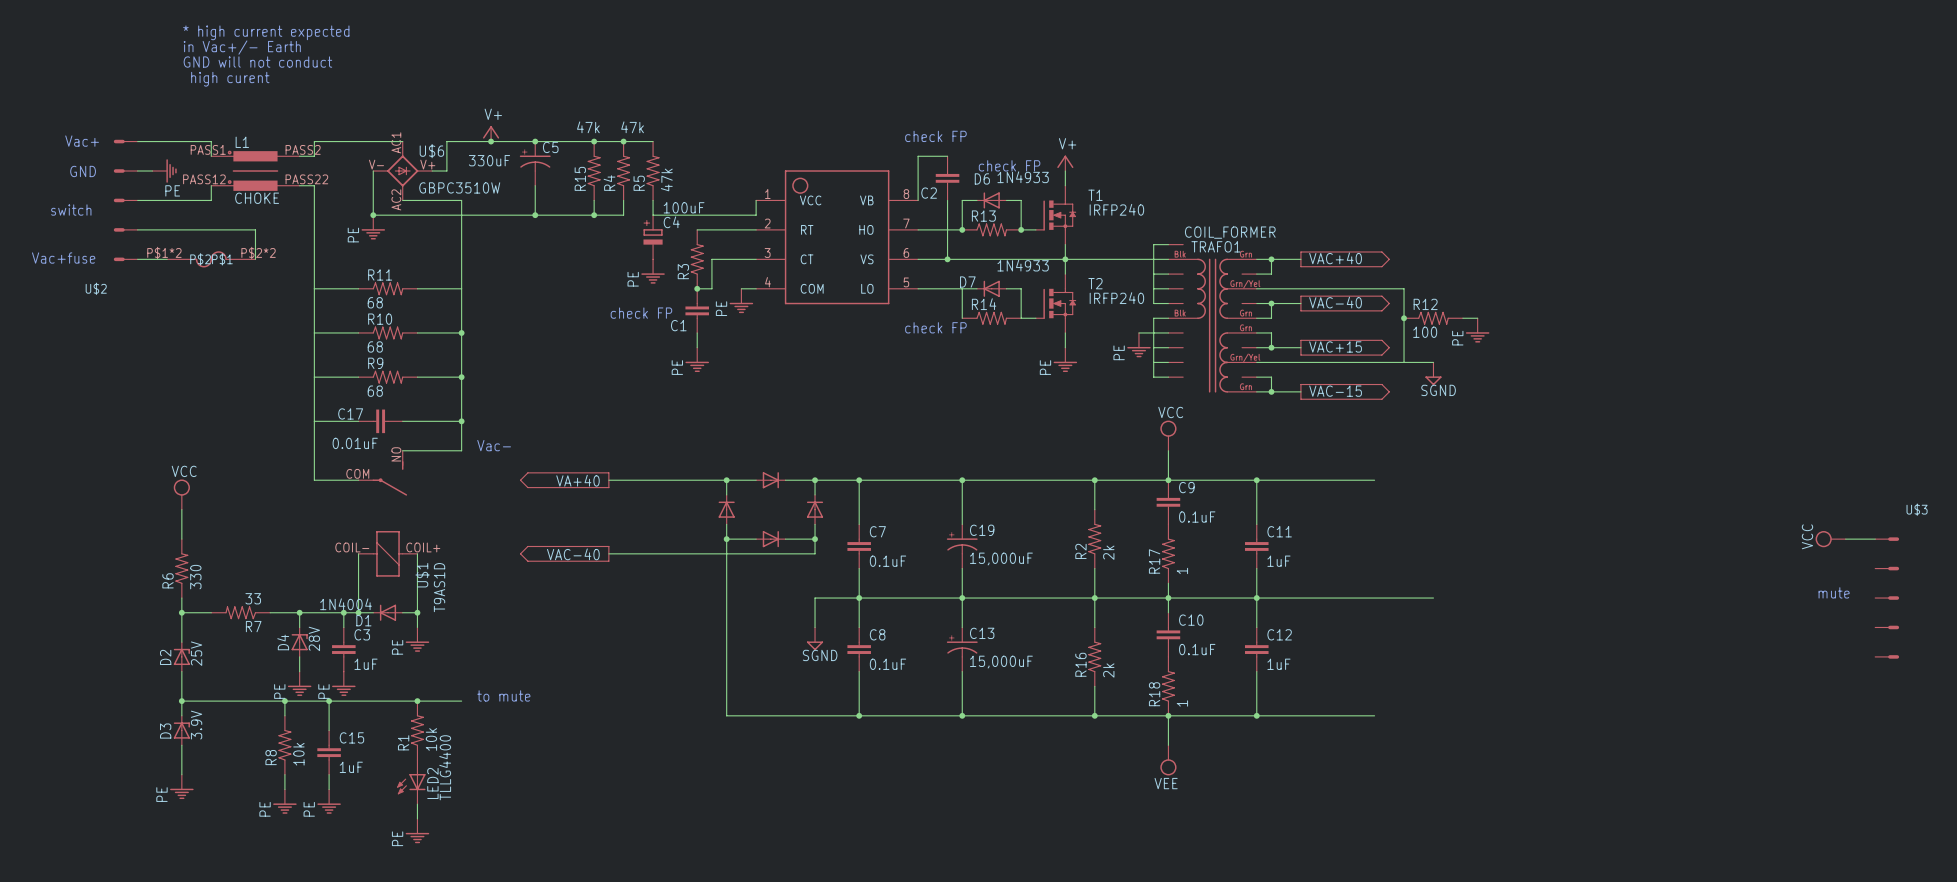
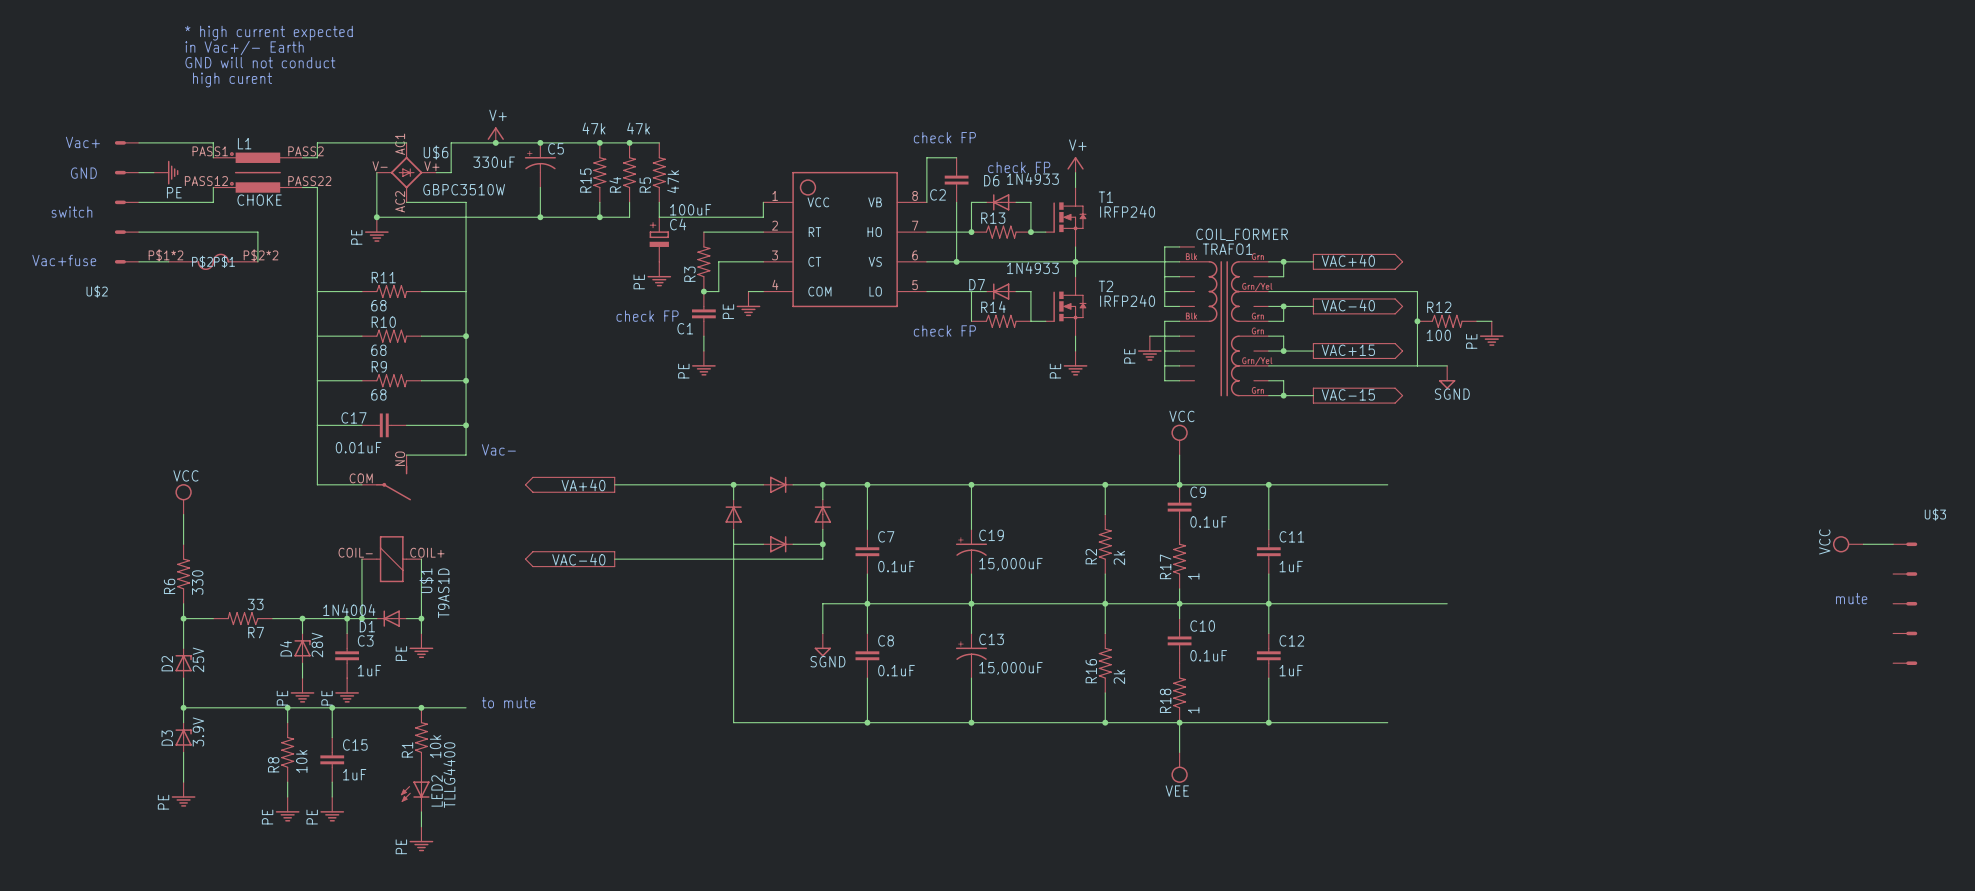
junction: (726, 539) -> none

